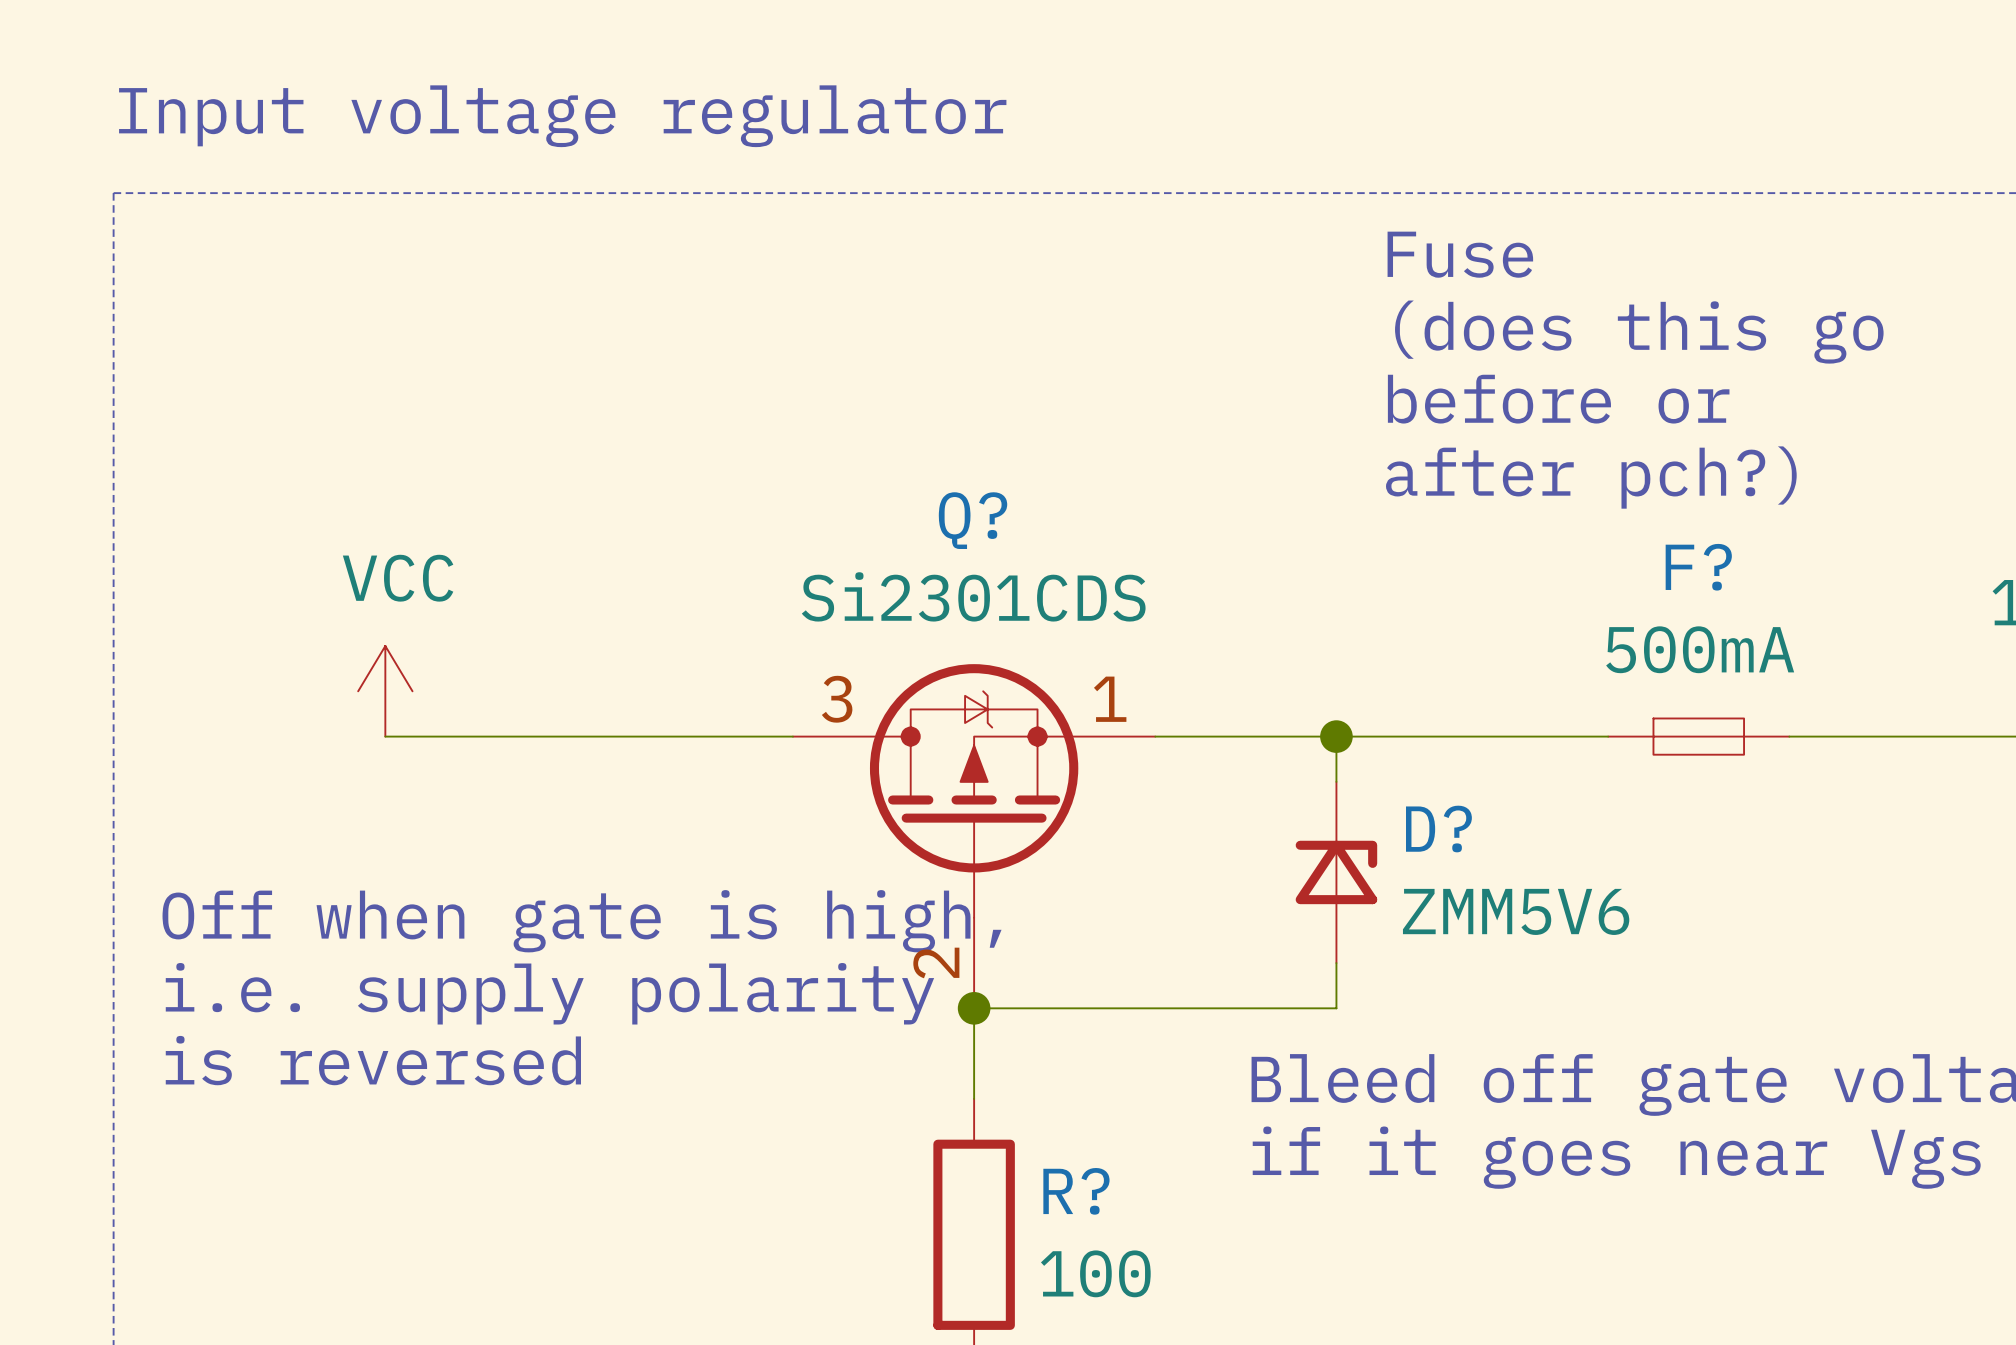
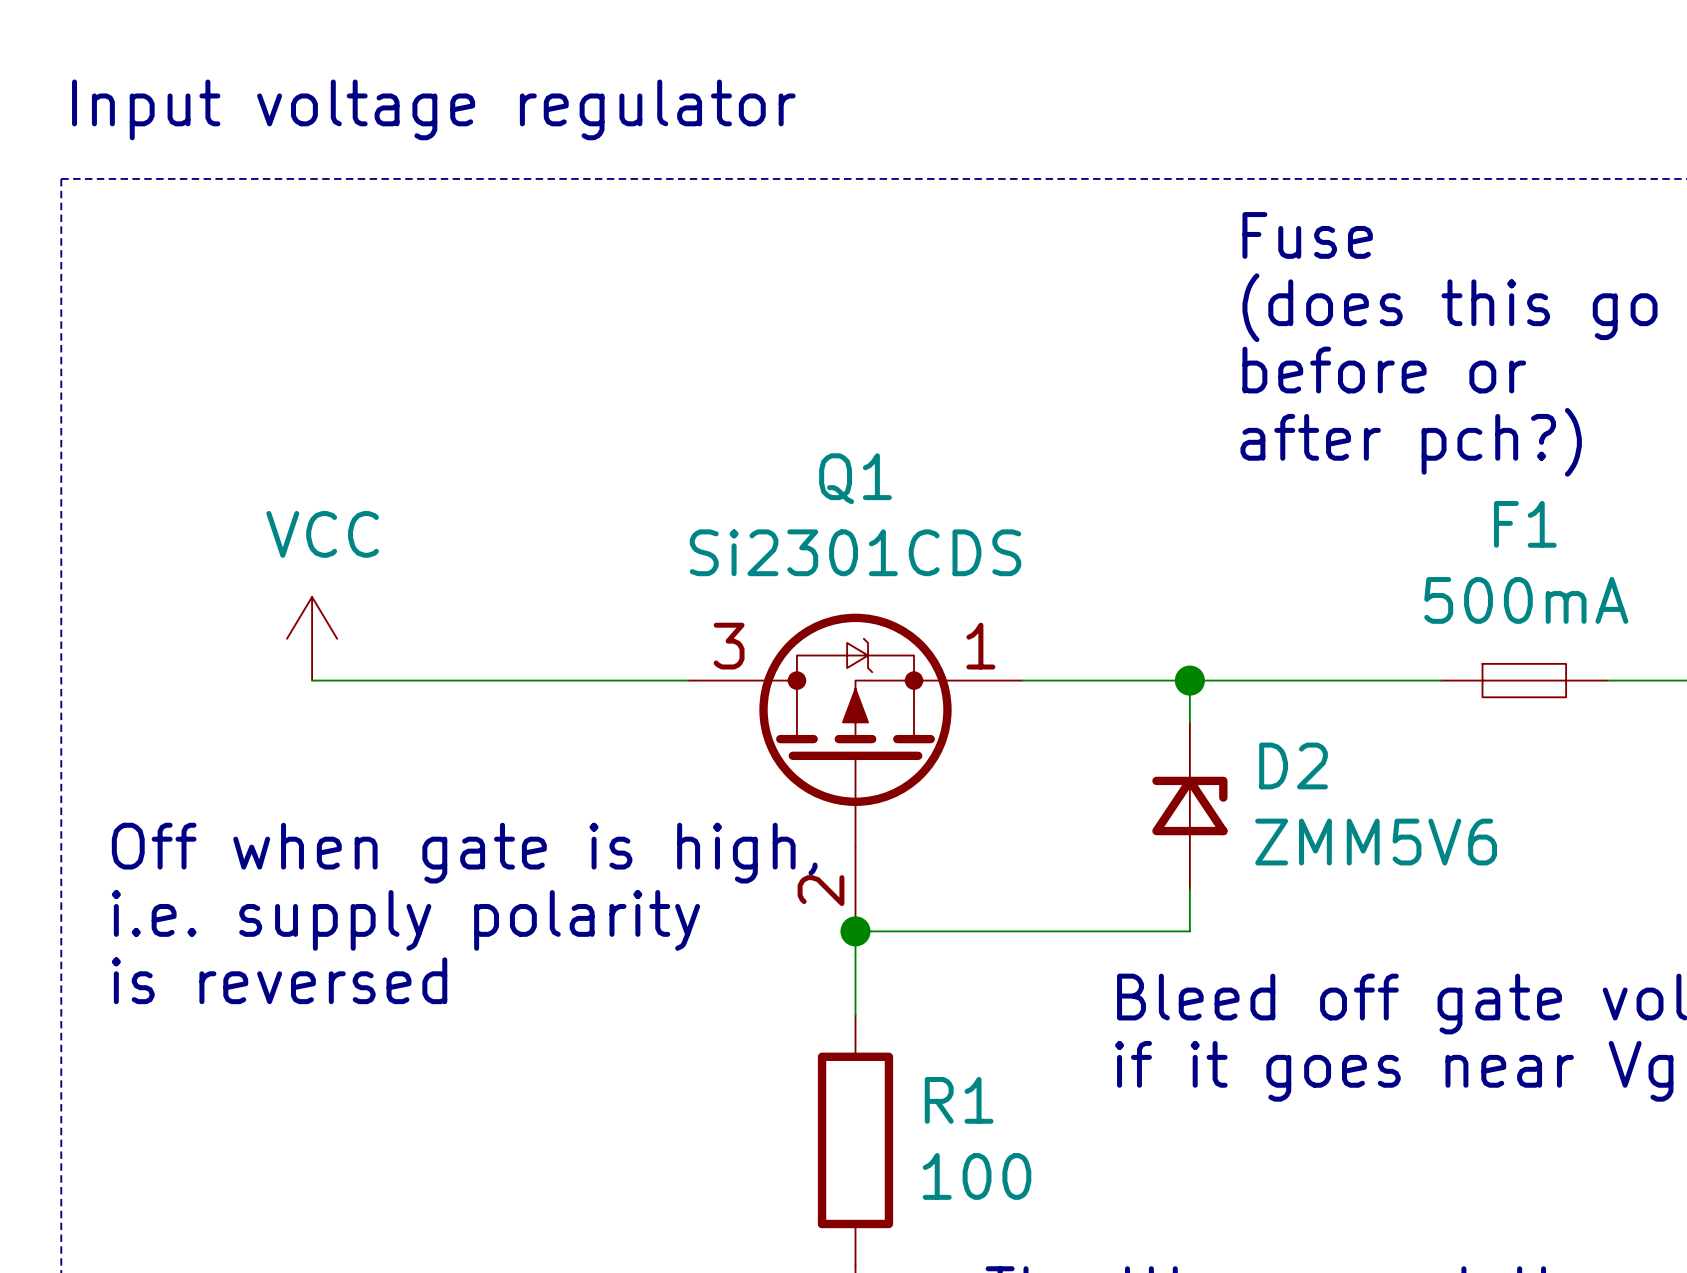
Q? name: Q? (973, 520) -> Q1 (855, 478)
F? name: F? (1698, 567) -> F1 (1525, 524)
D? name: D? (1438, 829) -> D2 (1293, 765)
R? name: R? (1076, 1191) -> R1 (959, 1100)

